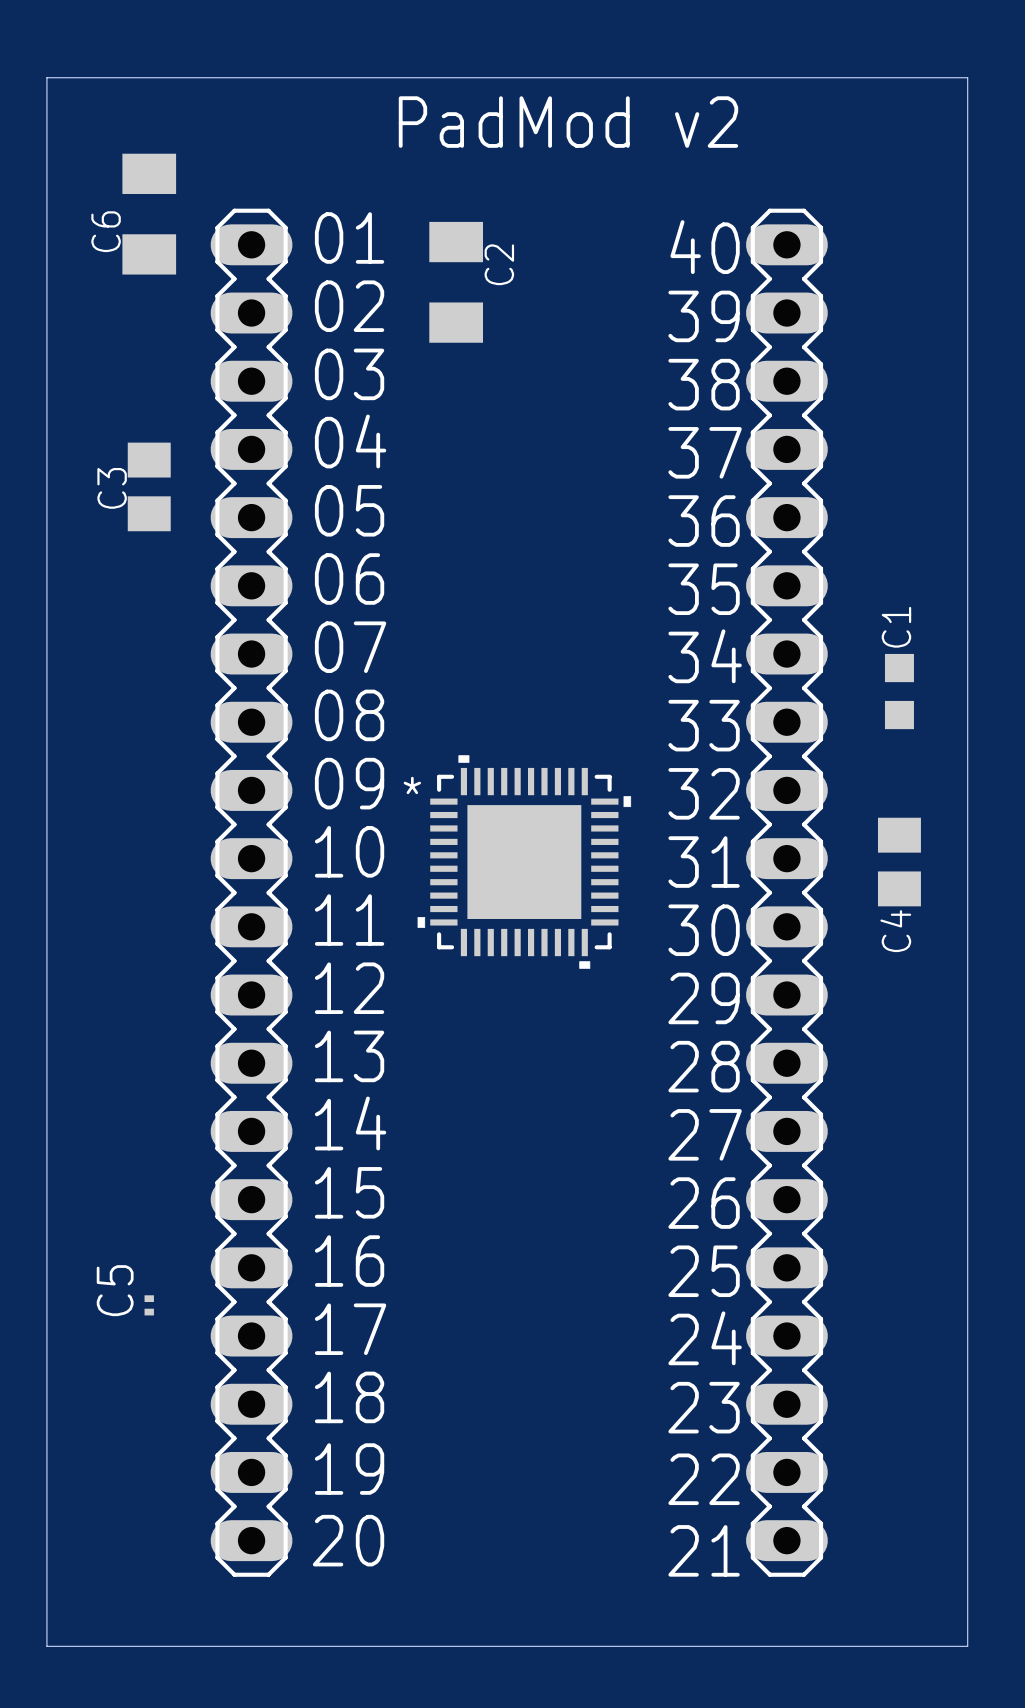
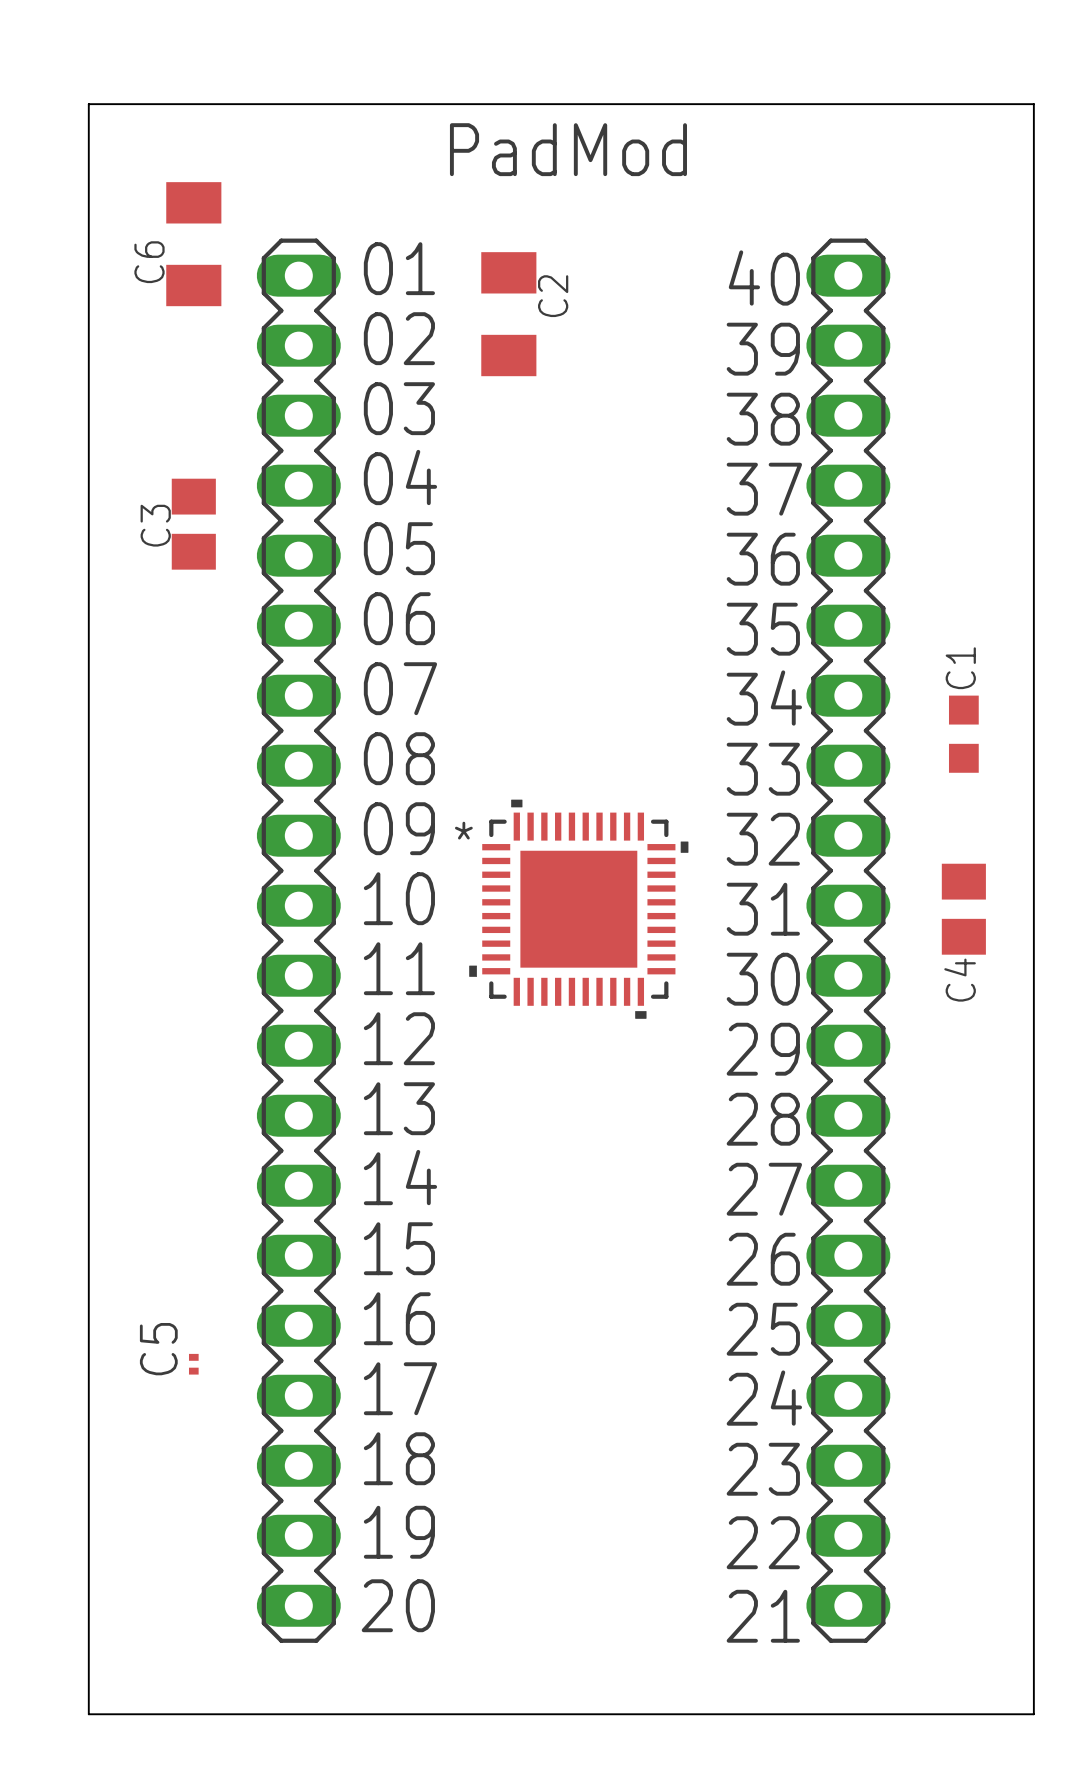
text: PadMod v2 (568, 122) -> PadMod (568, 149)

